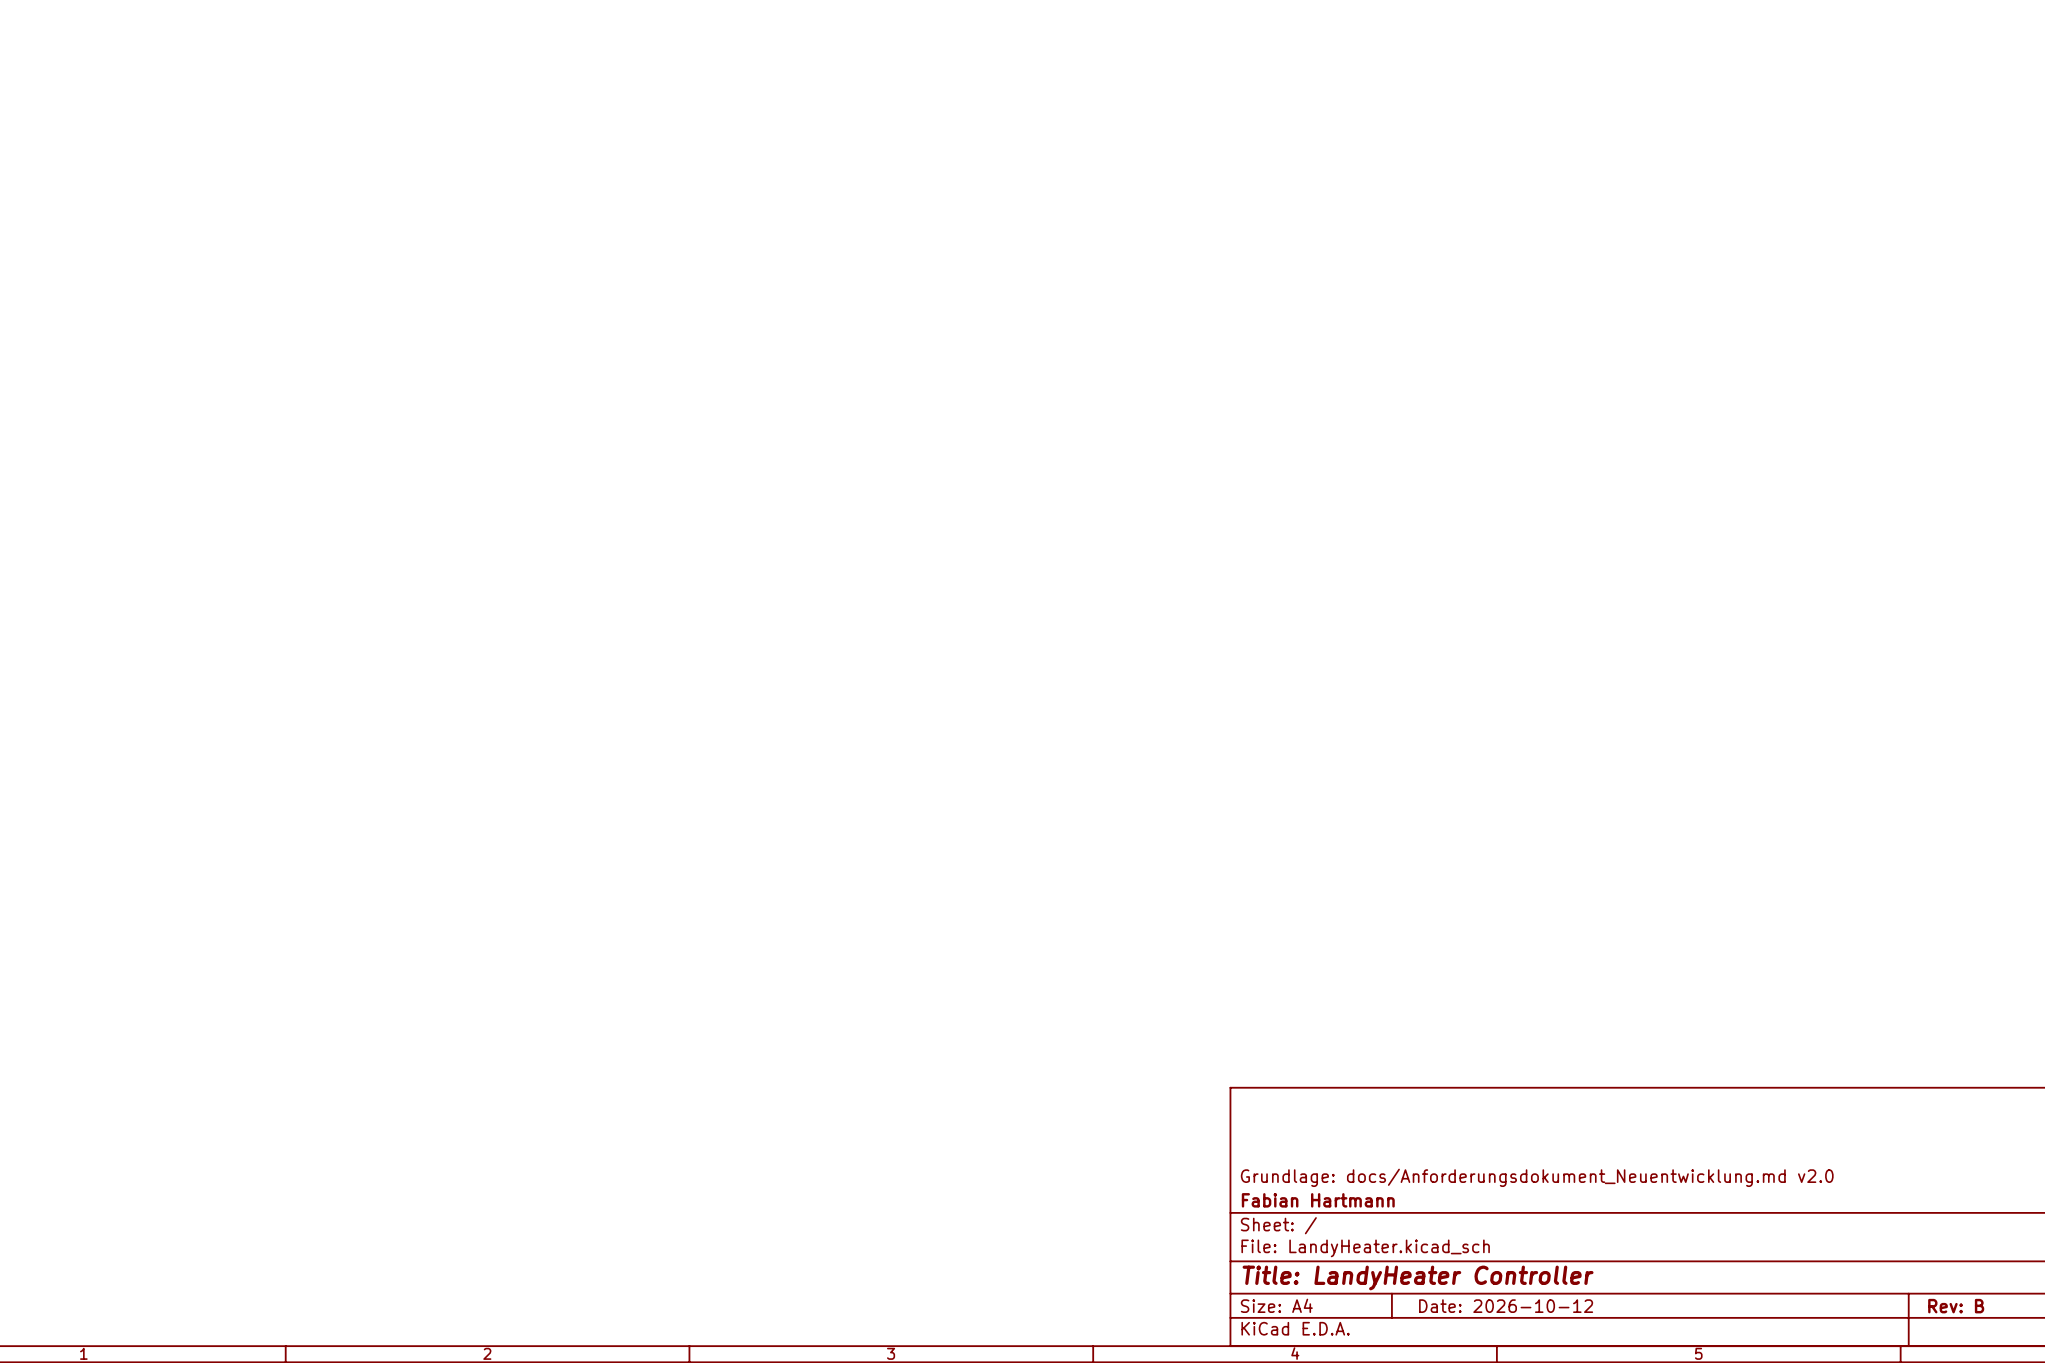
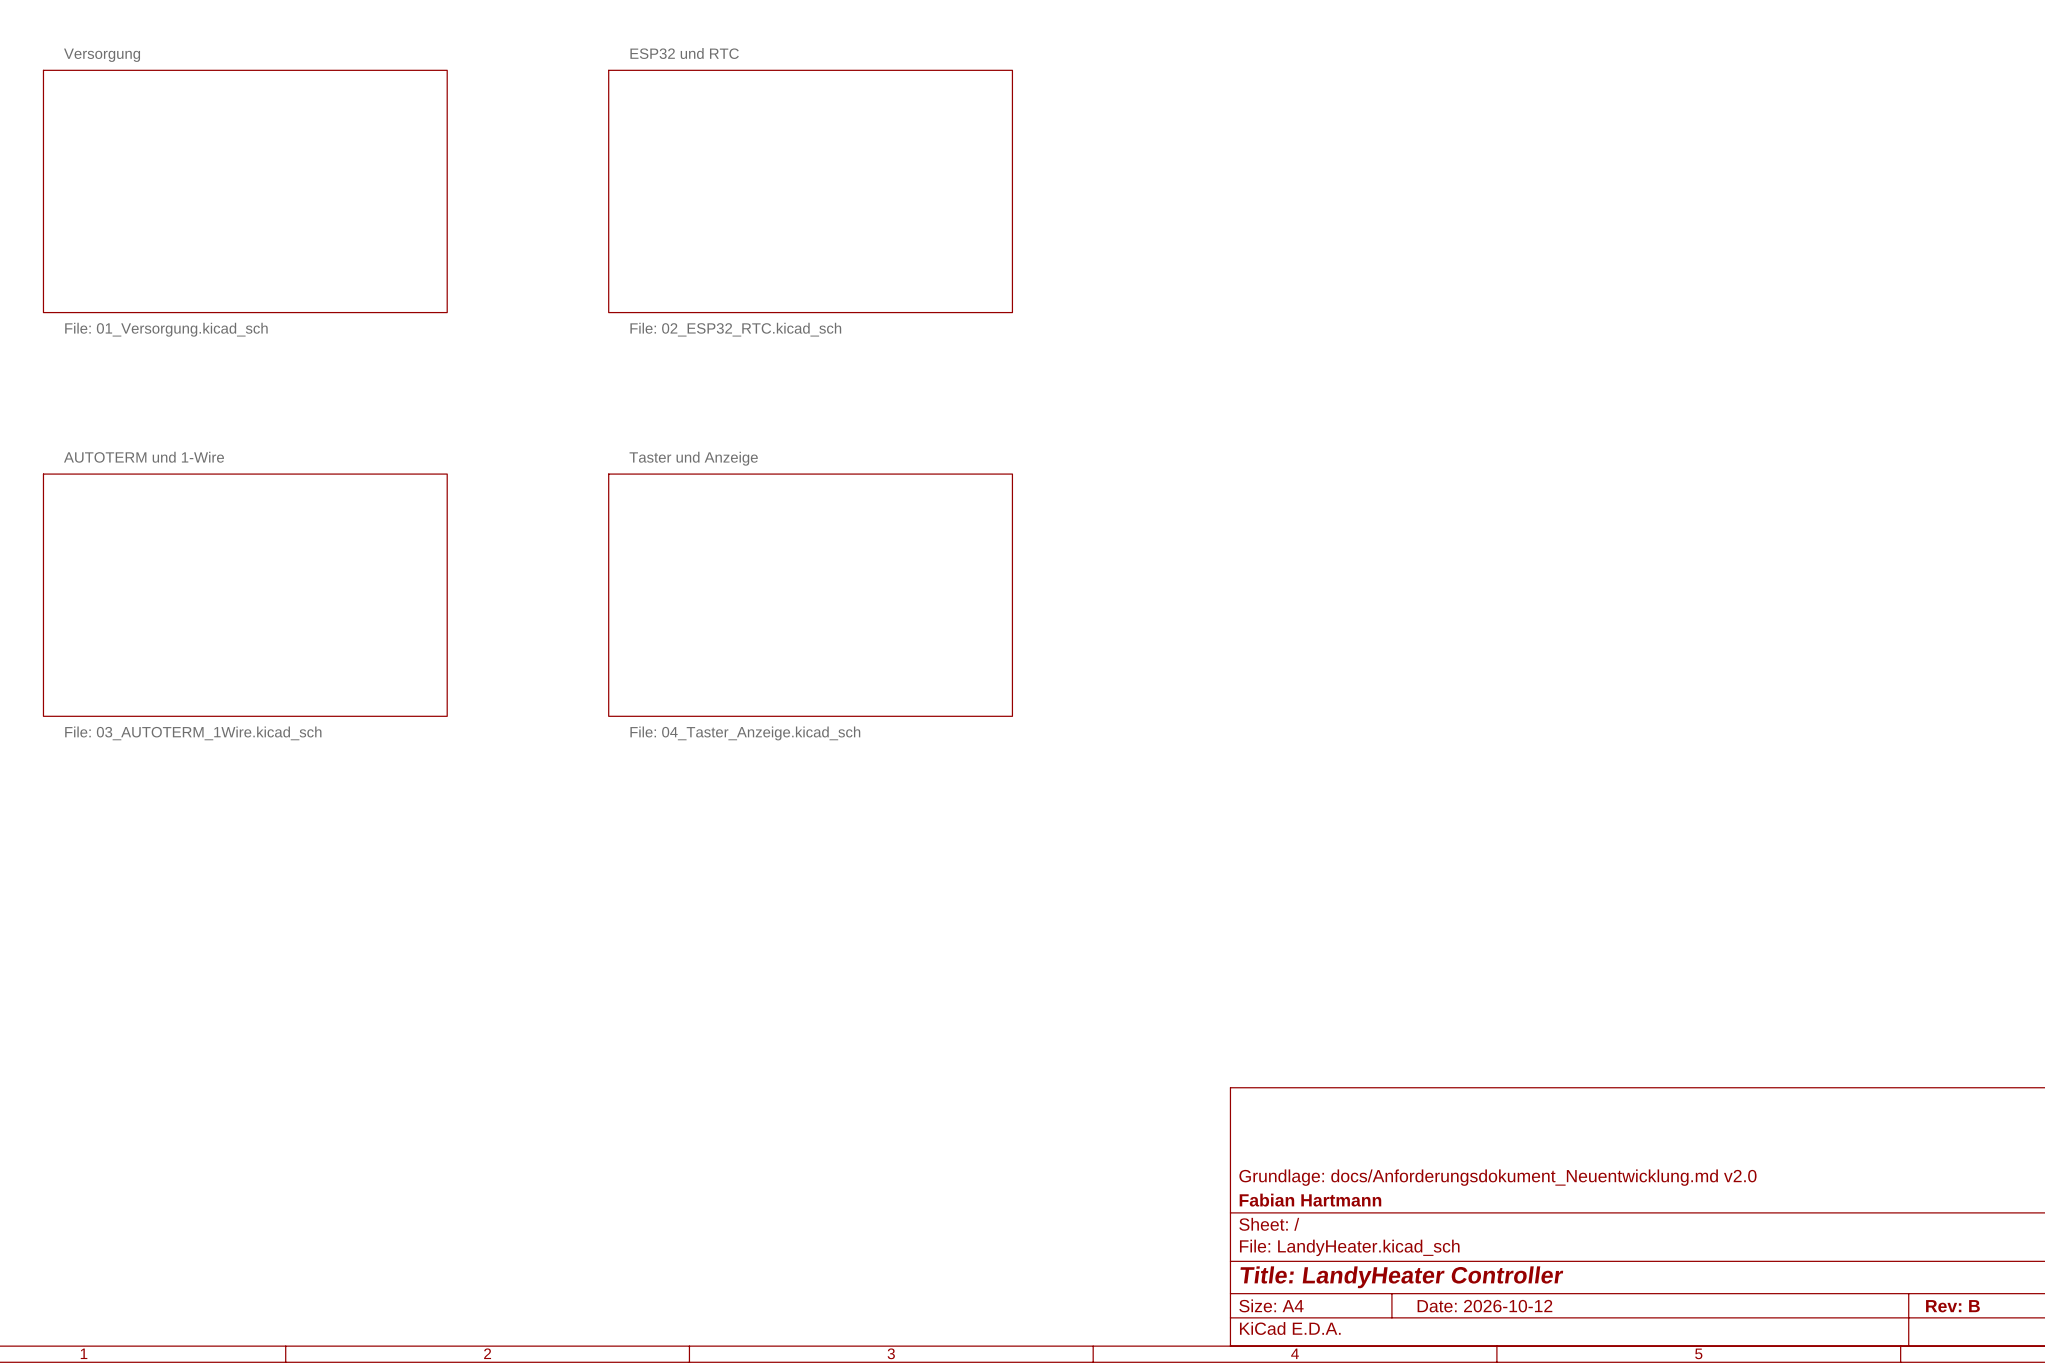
sheet Versorgung: none -> File: 01_Versorgung.kicad_sch (245, 191)
sheet ESP32 und RTC: none -> File: 02_ESP32_RTC.kicad_sch (810, 191)
sheet AUTOTERM und 1-Wire: none -> File: 03_AUTOTERM_1Wire.kicad_sch (245, 595)
sheet Taster und Anzeige: none -> File: 04_Taster_Anzeige.kicad_sch (810, 595)

